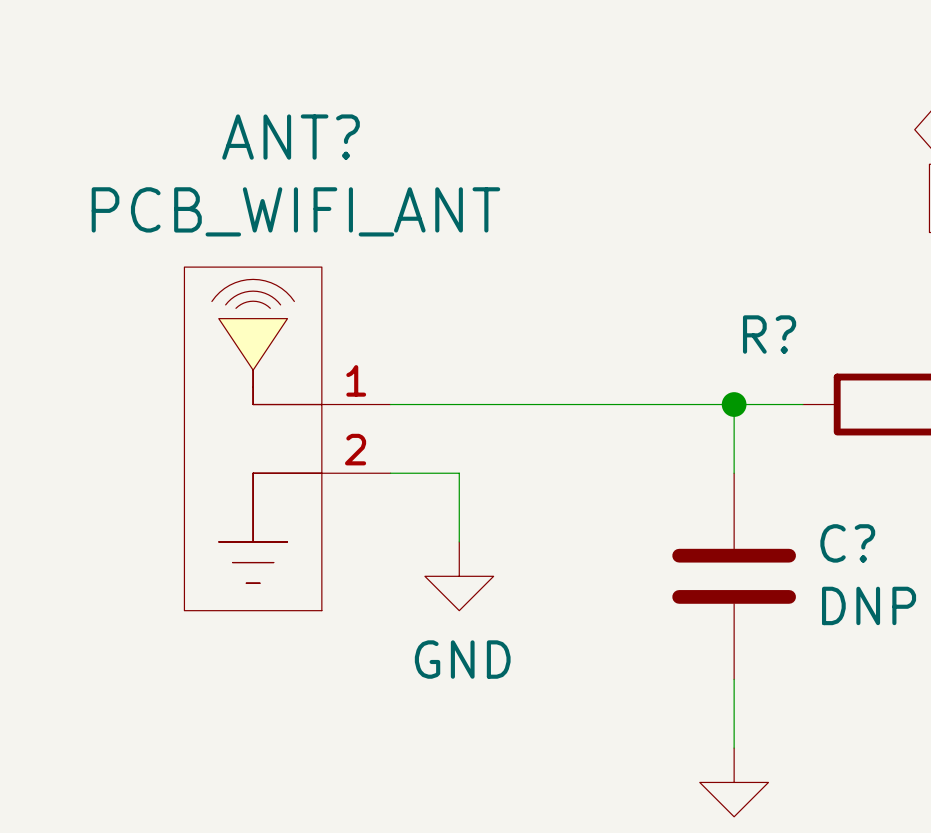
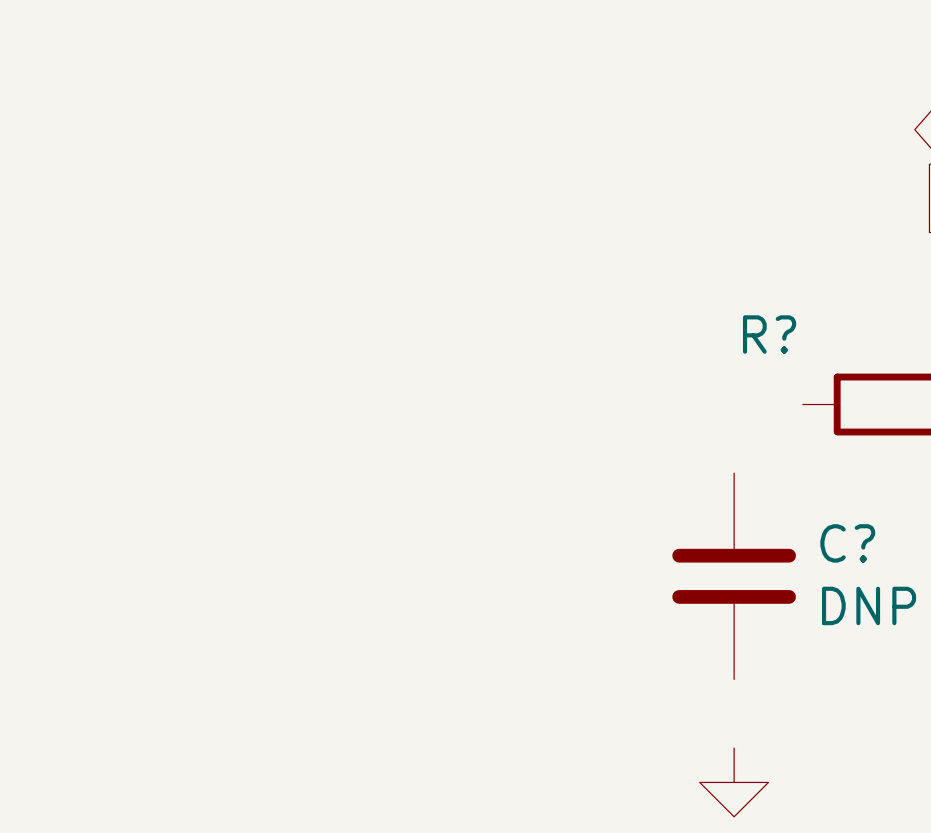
wire: (390, 404) (802, 404) -> none
wire: (734, 404) (734, 473) -> none
junction: (734, 404) -> none
ANT?: PCB_WIFI_ANT (287, 438) -> none
wire: (390, 473) (459, 473) (459, 541) -> none
power symbol: GND (459, 576) -> none
wire: (734, 679) (734, 748) -> none

